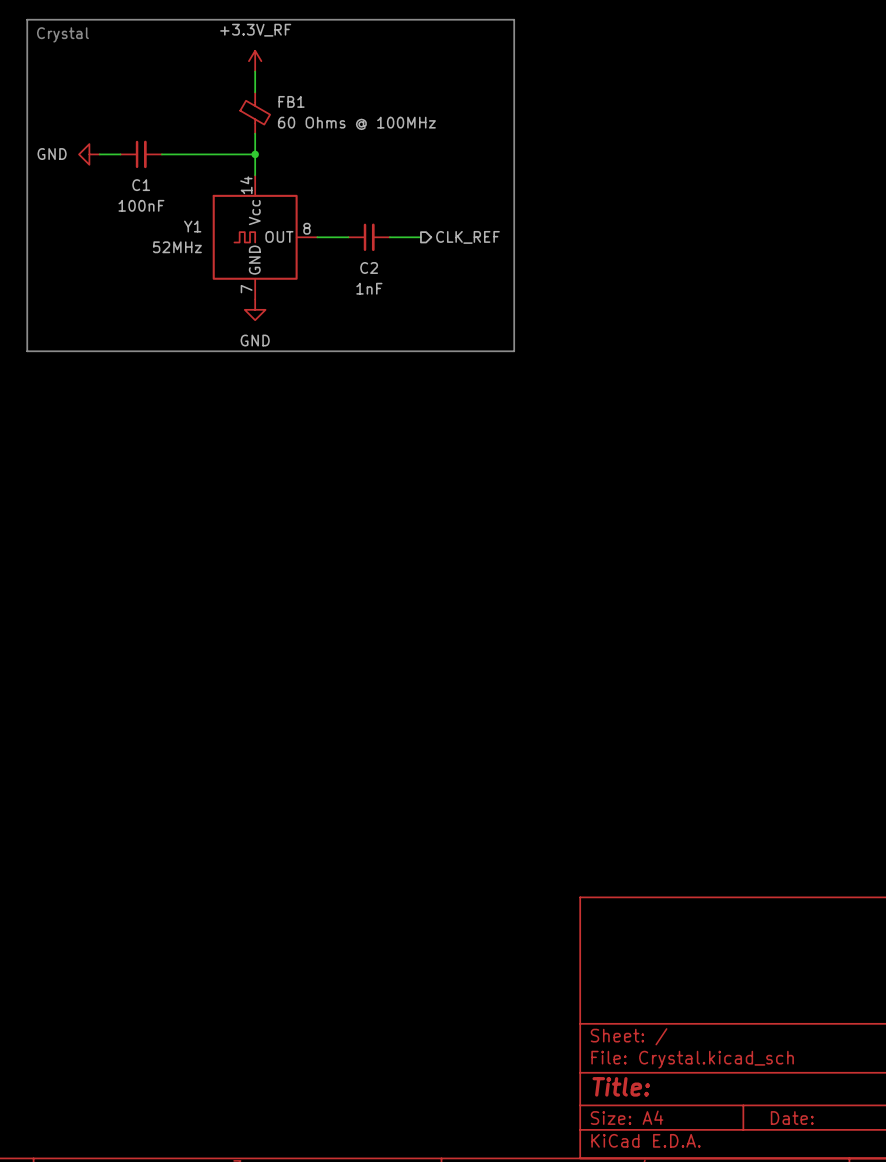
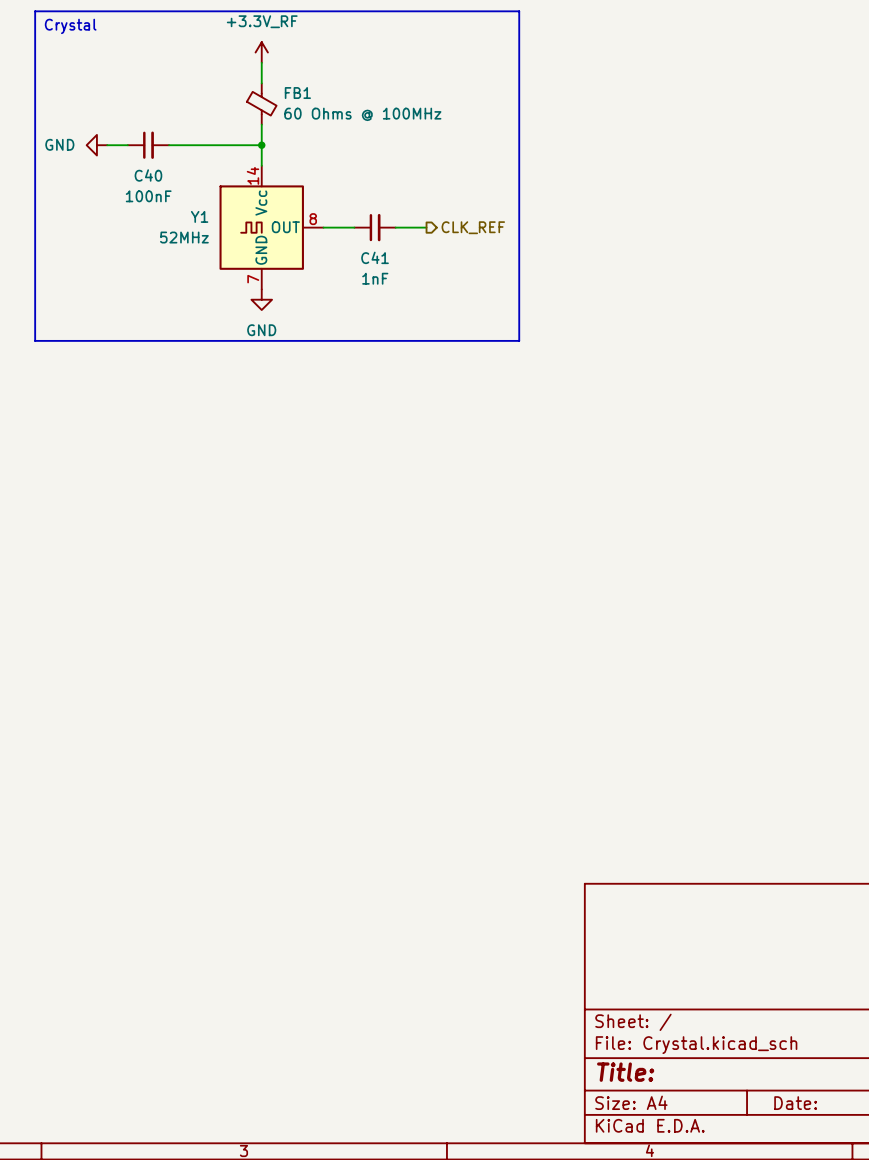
C1 name: C1 (141, 185) -> C40 (148, 175)
C2 name: C2 (369, 268) -> C41 (375, 257)

